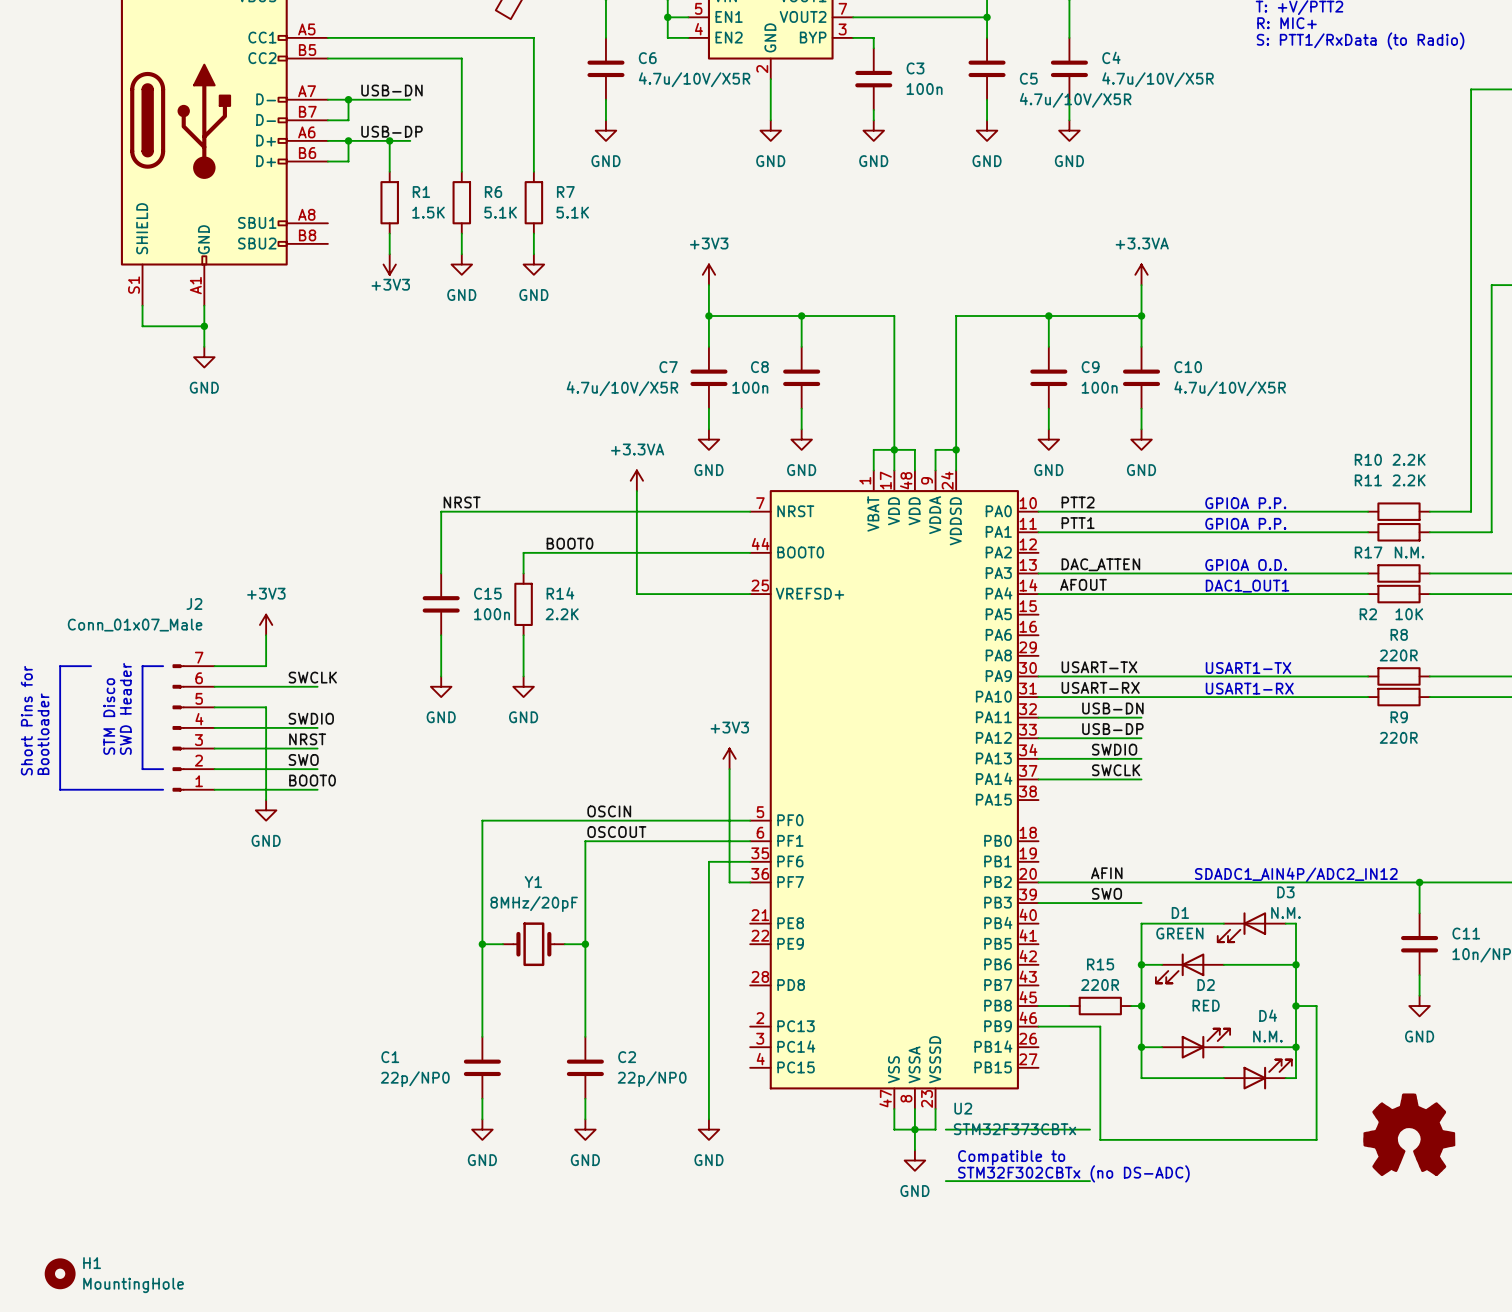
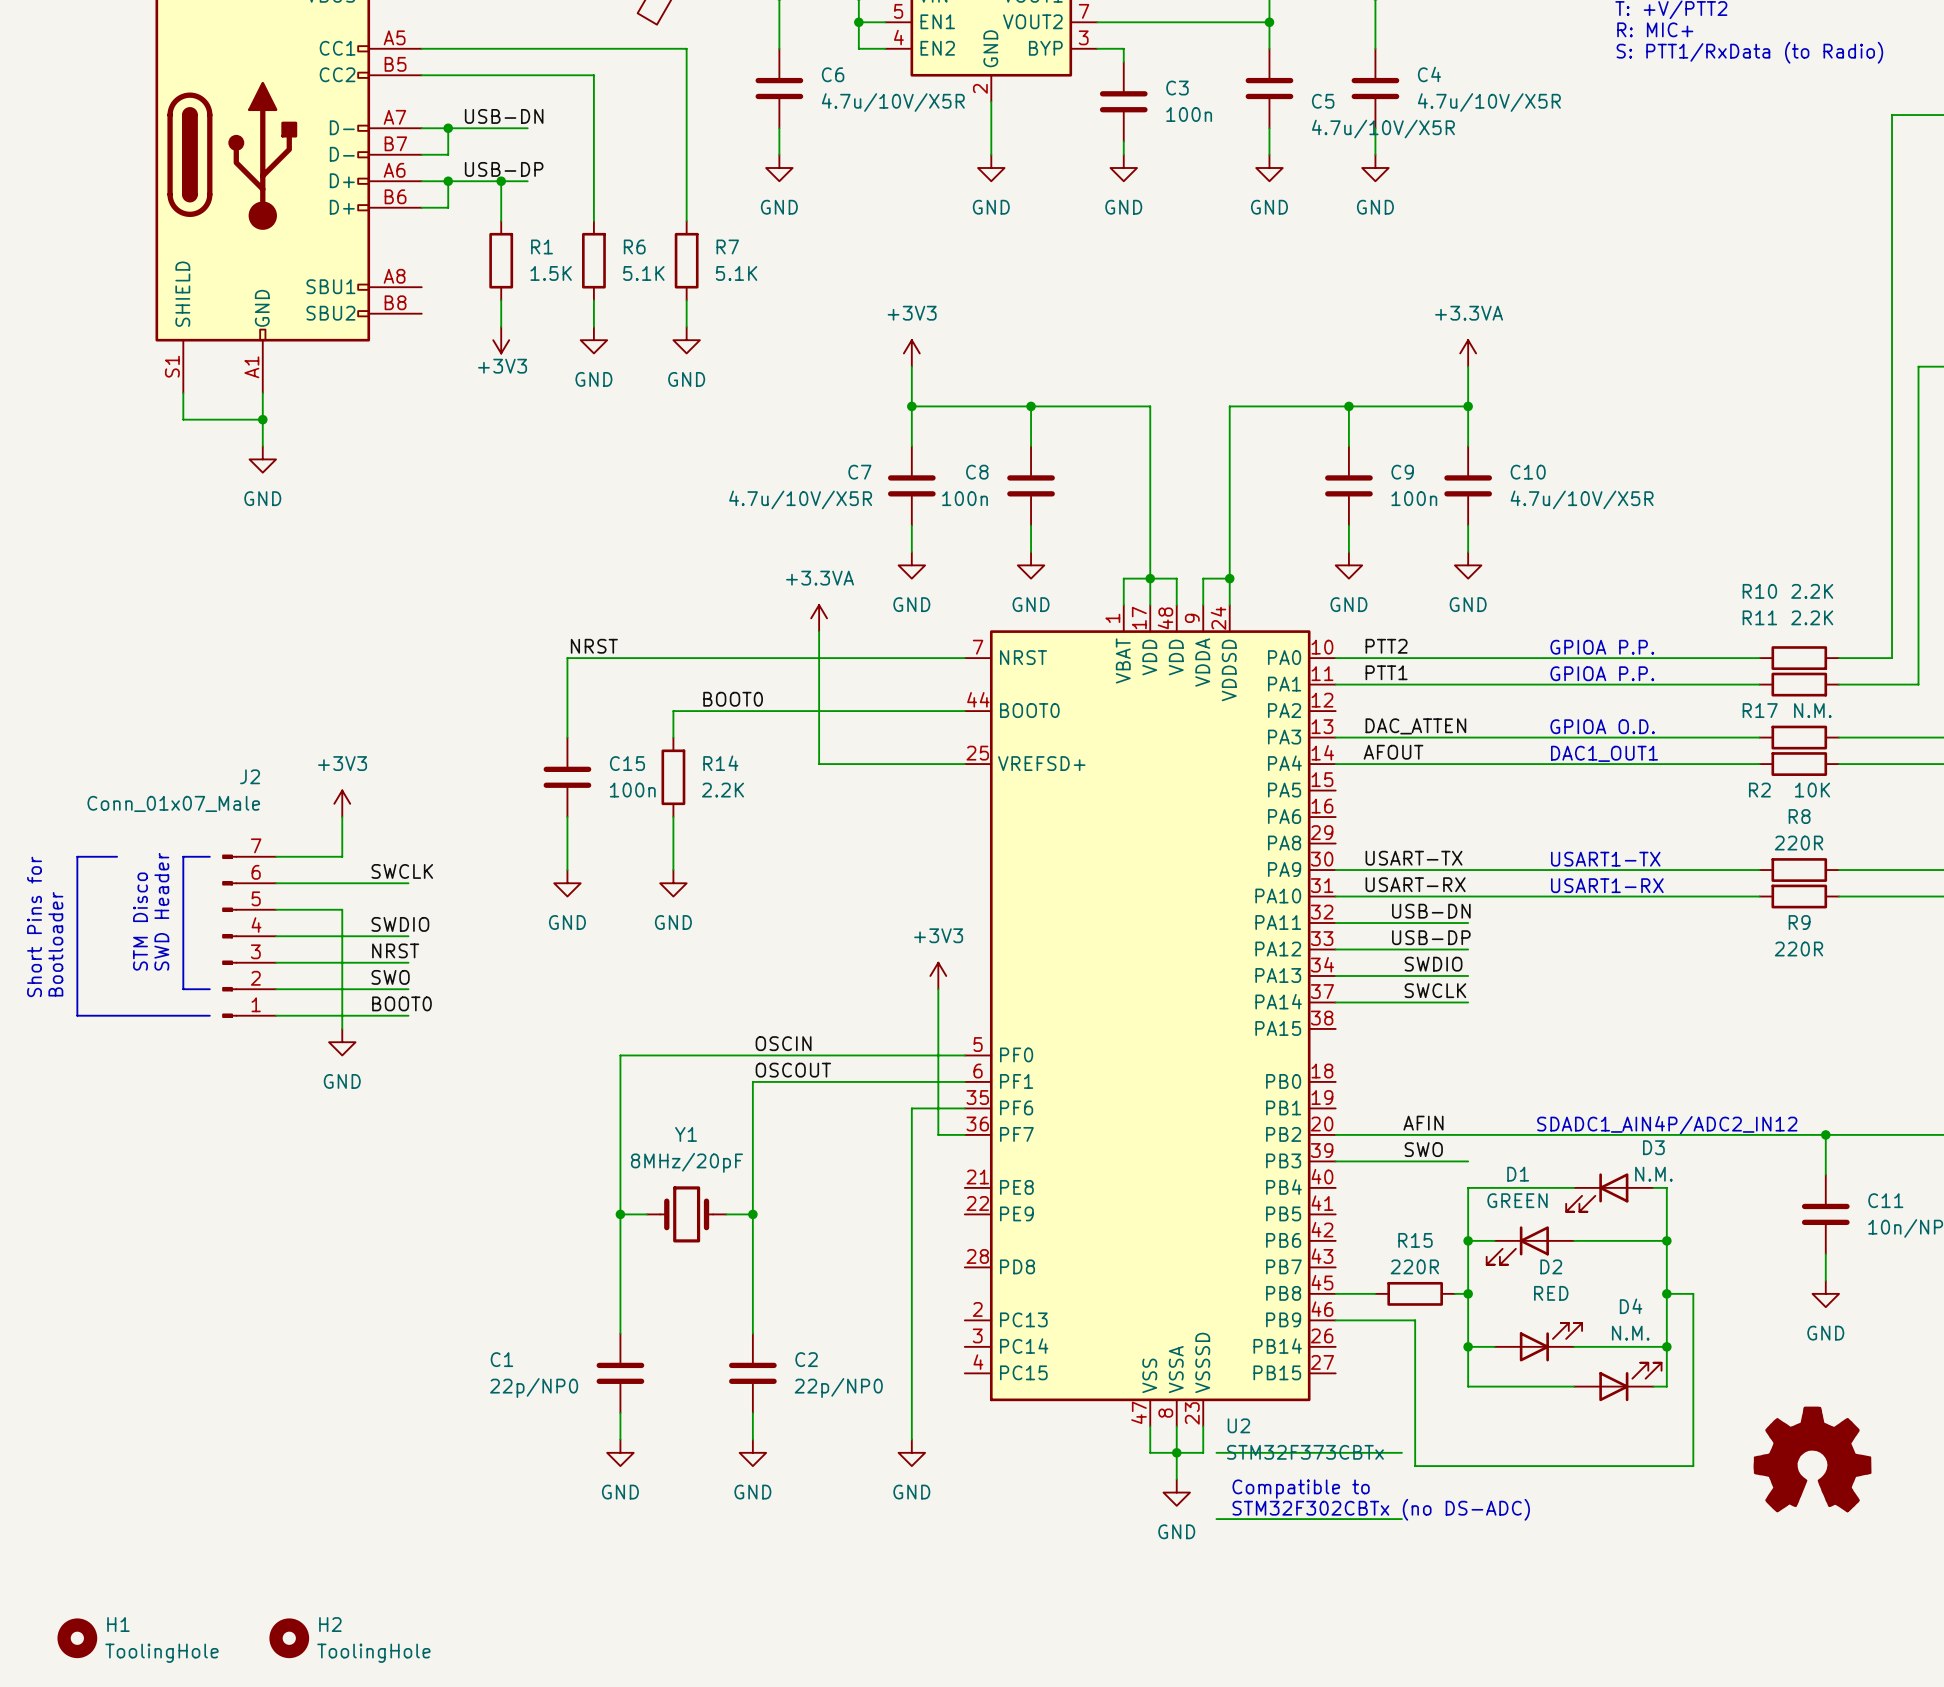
H2: none -> ToolingHole (289, 1638)
H1 value: MountingHole (133, 1285) -> ToolingHole (161, 1653)

